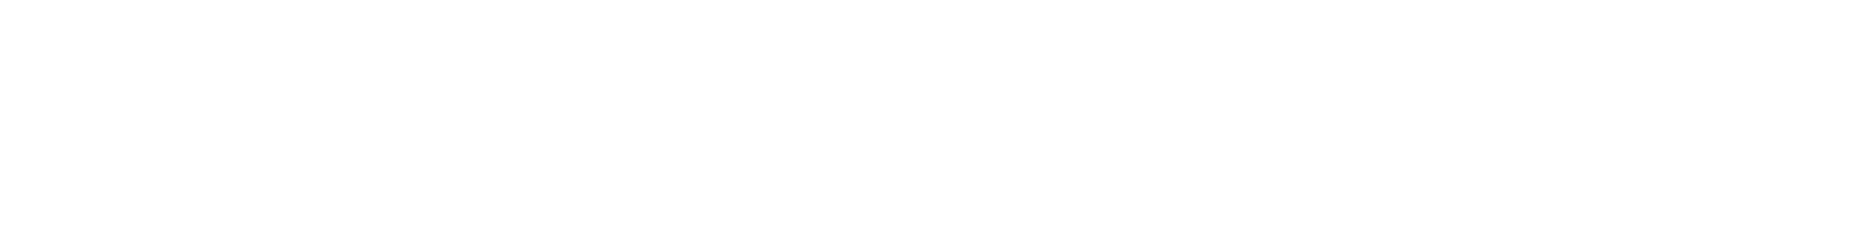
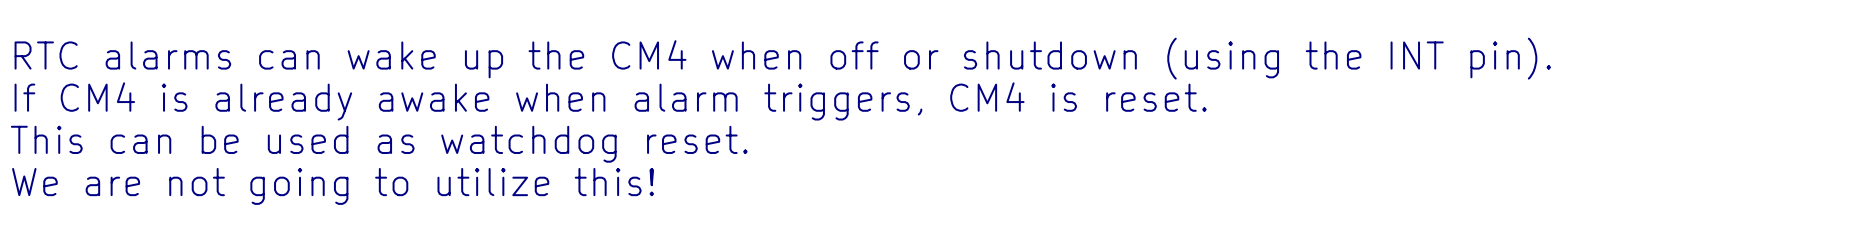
text: none -> RTC alarms can wake up the CM4 when off or shutdown (using the INT pin). (782, 58)
text: none -> If CM4 is already awake when alarm triggers, CM4 is reset. (610, 101)
text: none -> This can be used as watchdog reset. (379, 144)
text: none -> We are not going to utilize this! (333, 186)

